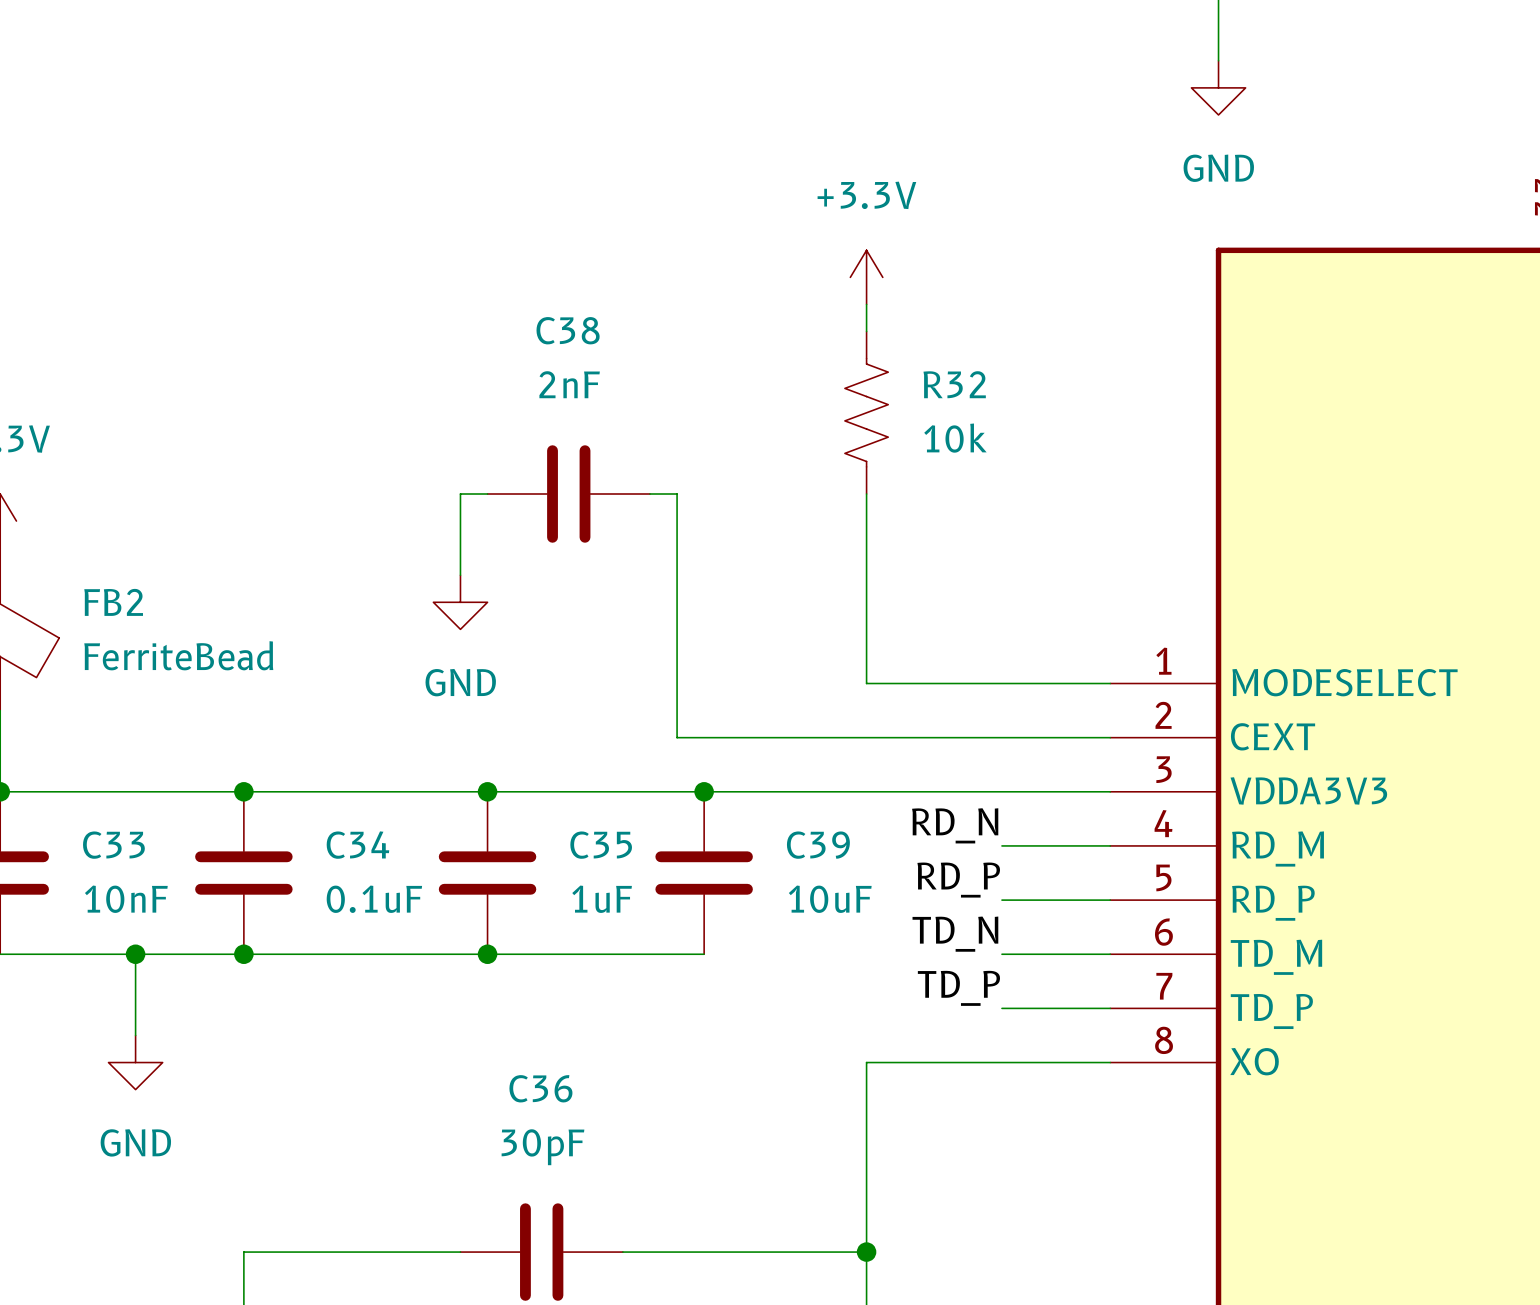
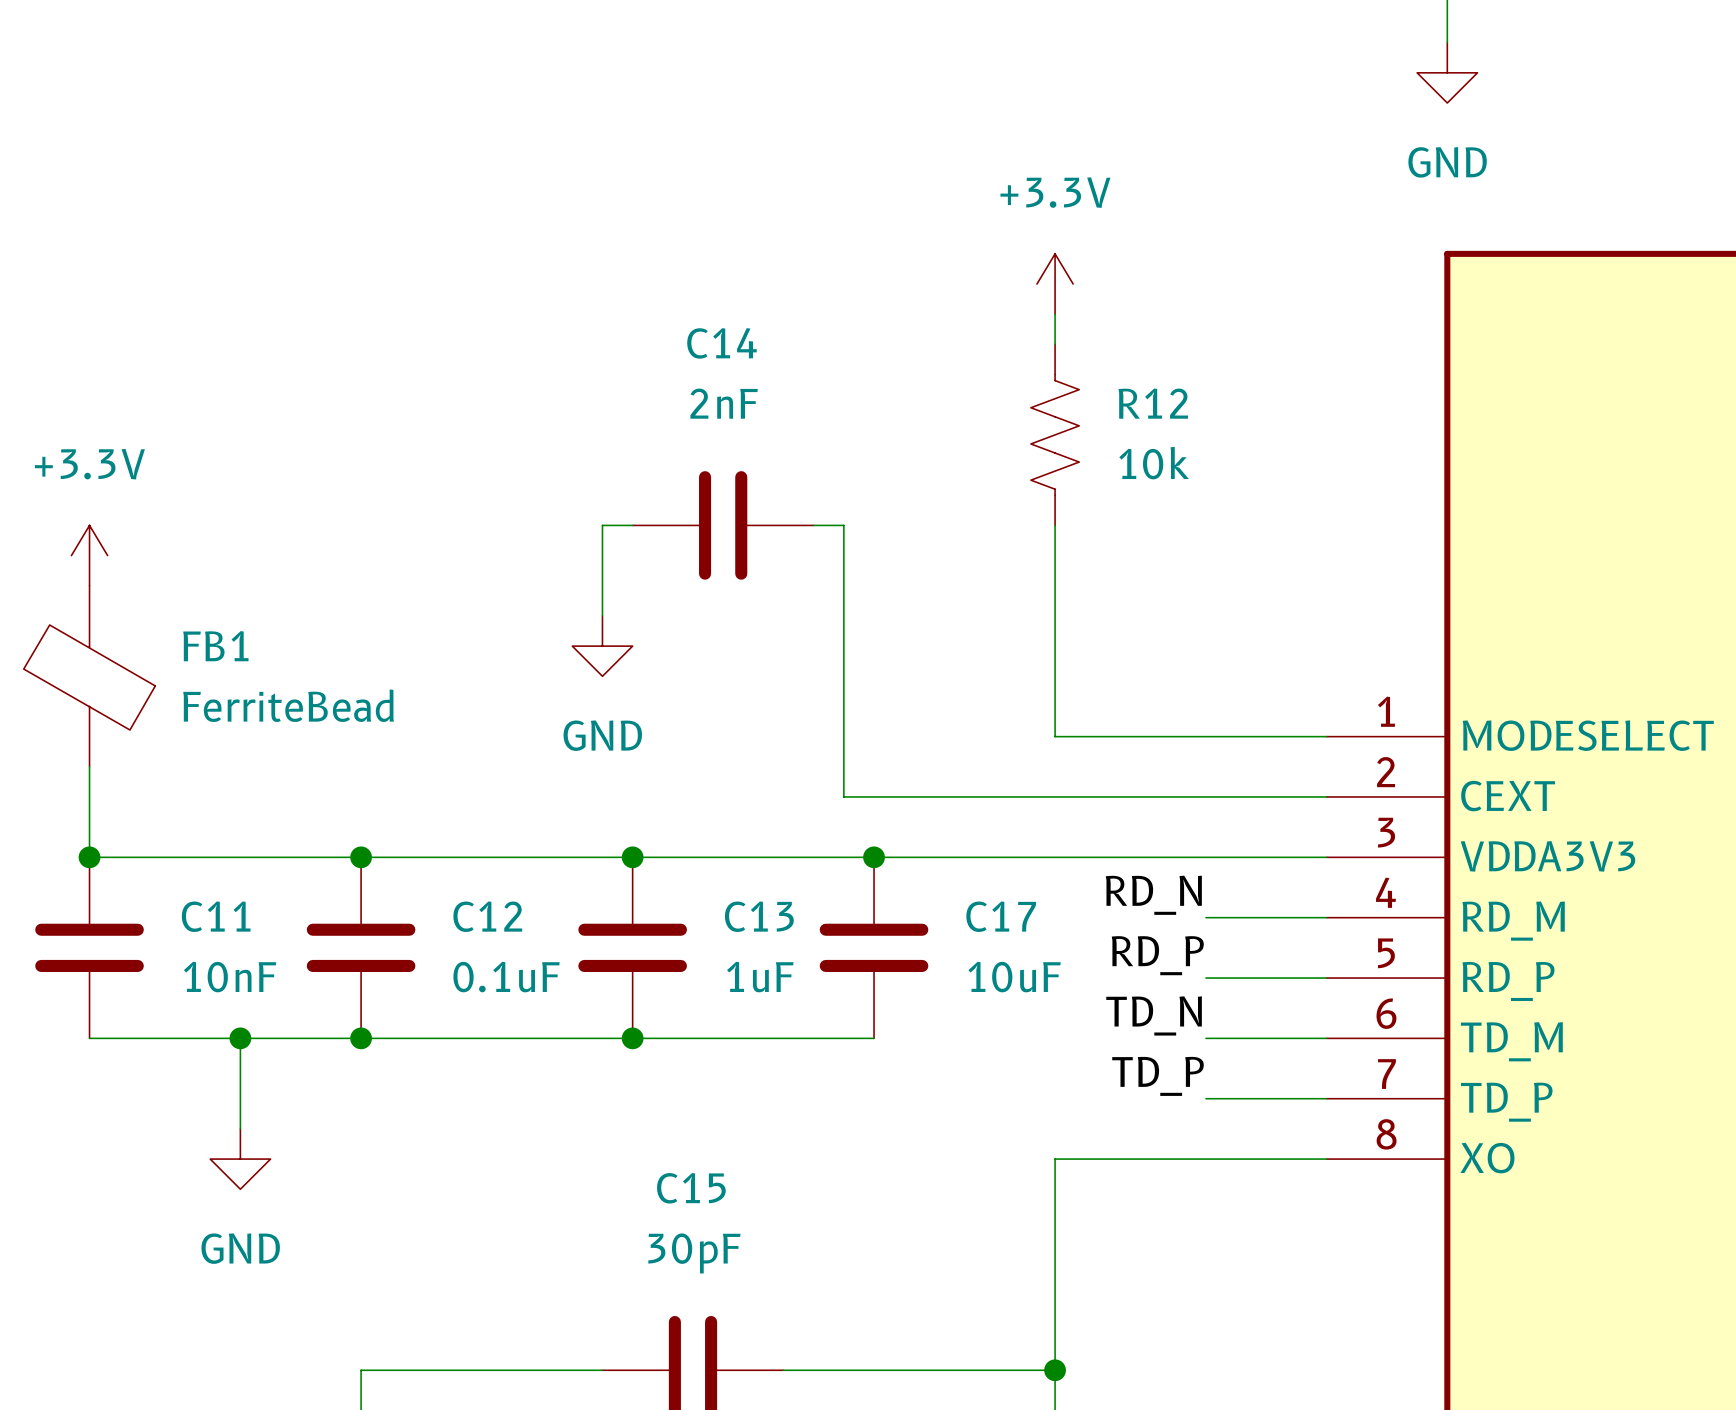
C38 name: C38 (568, 330) -> C14 (722, 343)
R32 name: R32 (954, 384) -> R12 (1153, 403)
FB2 name: FB2 (113, 602) -> FB1 (215, 646)
C33 name: C33 (113, 845) -> C11 (216, 916)
C34 name: C34 (357, 845) -> C12 (487, 916)
C35 name: C35 (601, 845) -> C13 (759, 916)
C39 name: C39 (818, 845) -> C17 (1001, 916)
C36 name: C36 (540, 1088) -> C15 (691, 1188)

